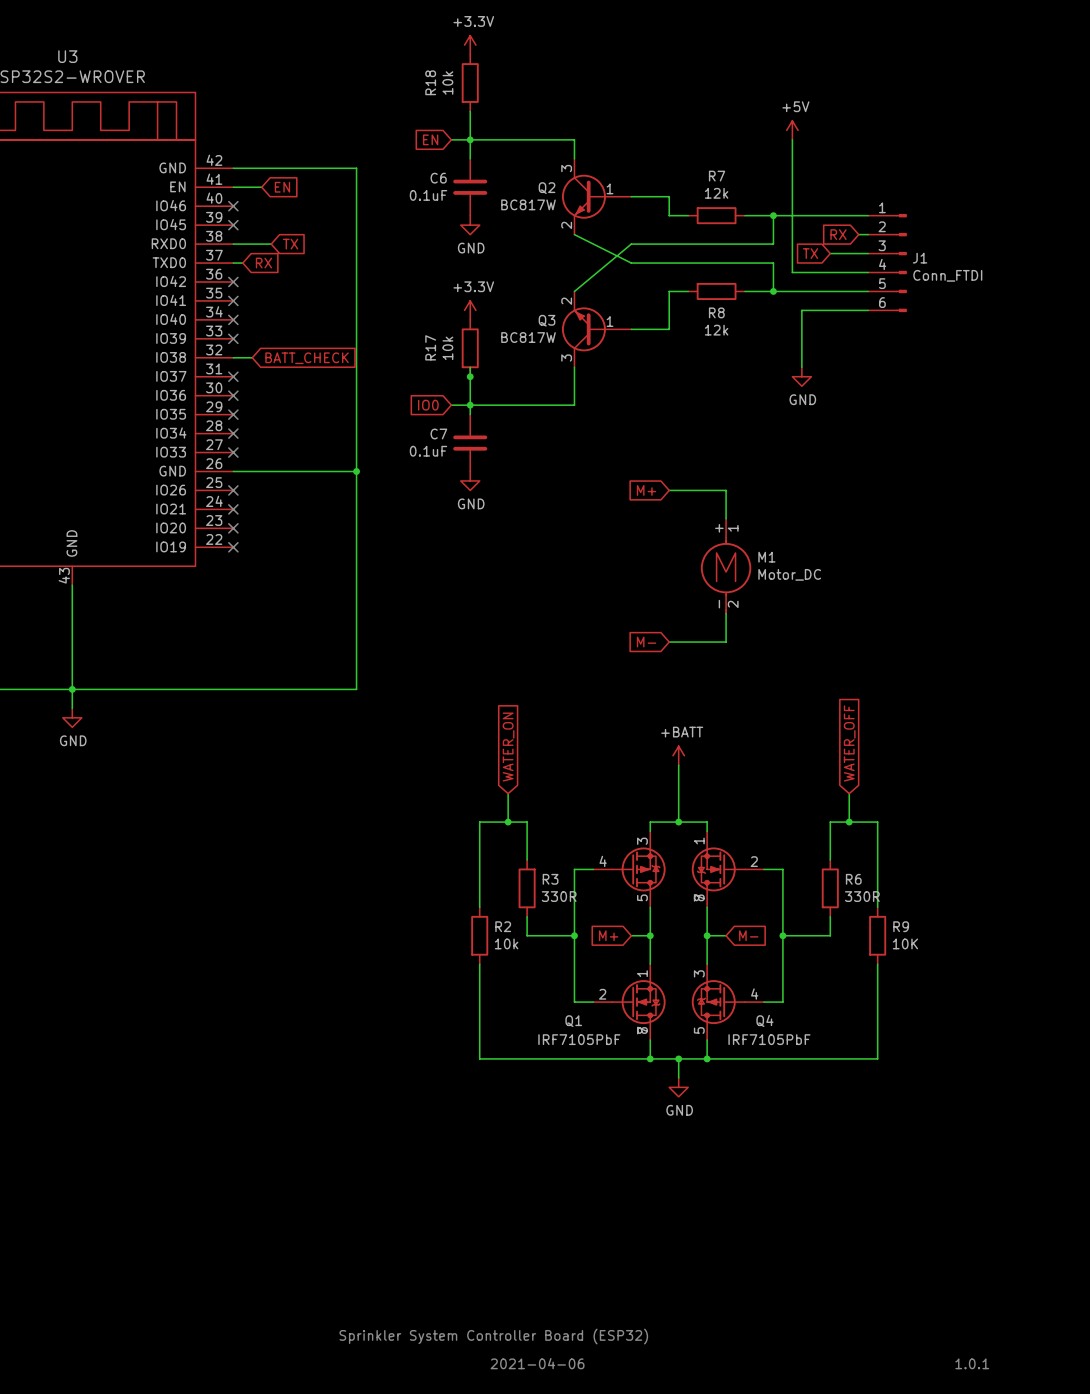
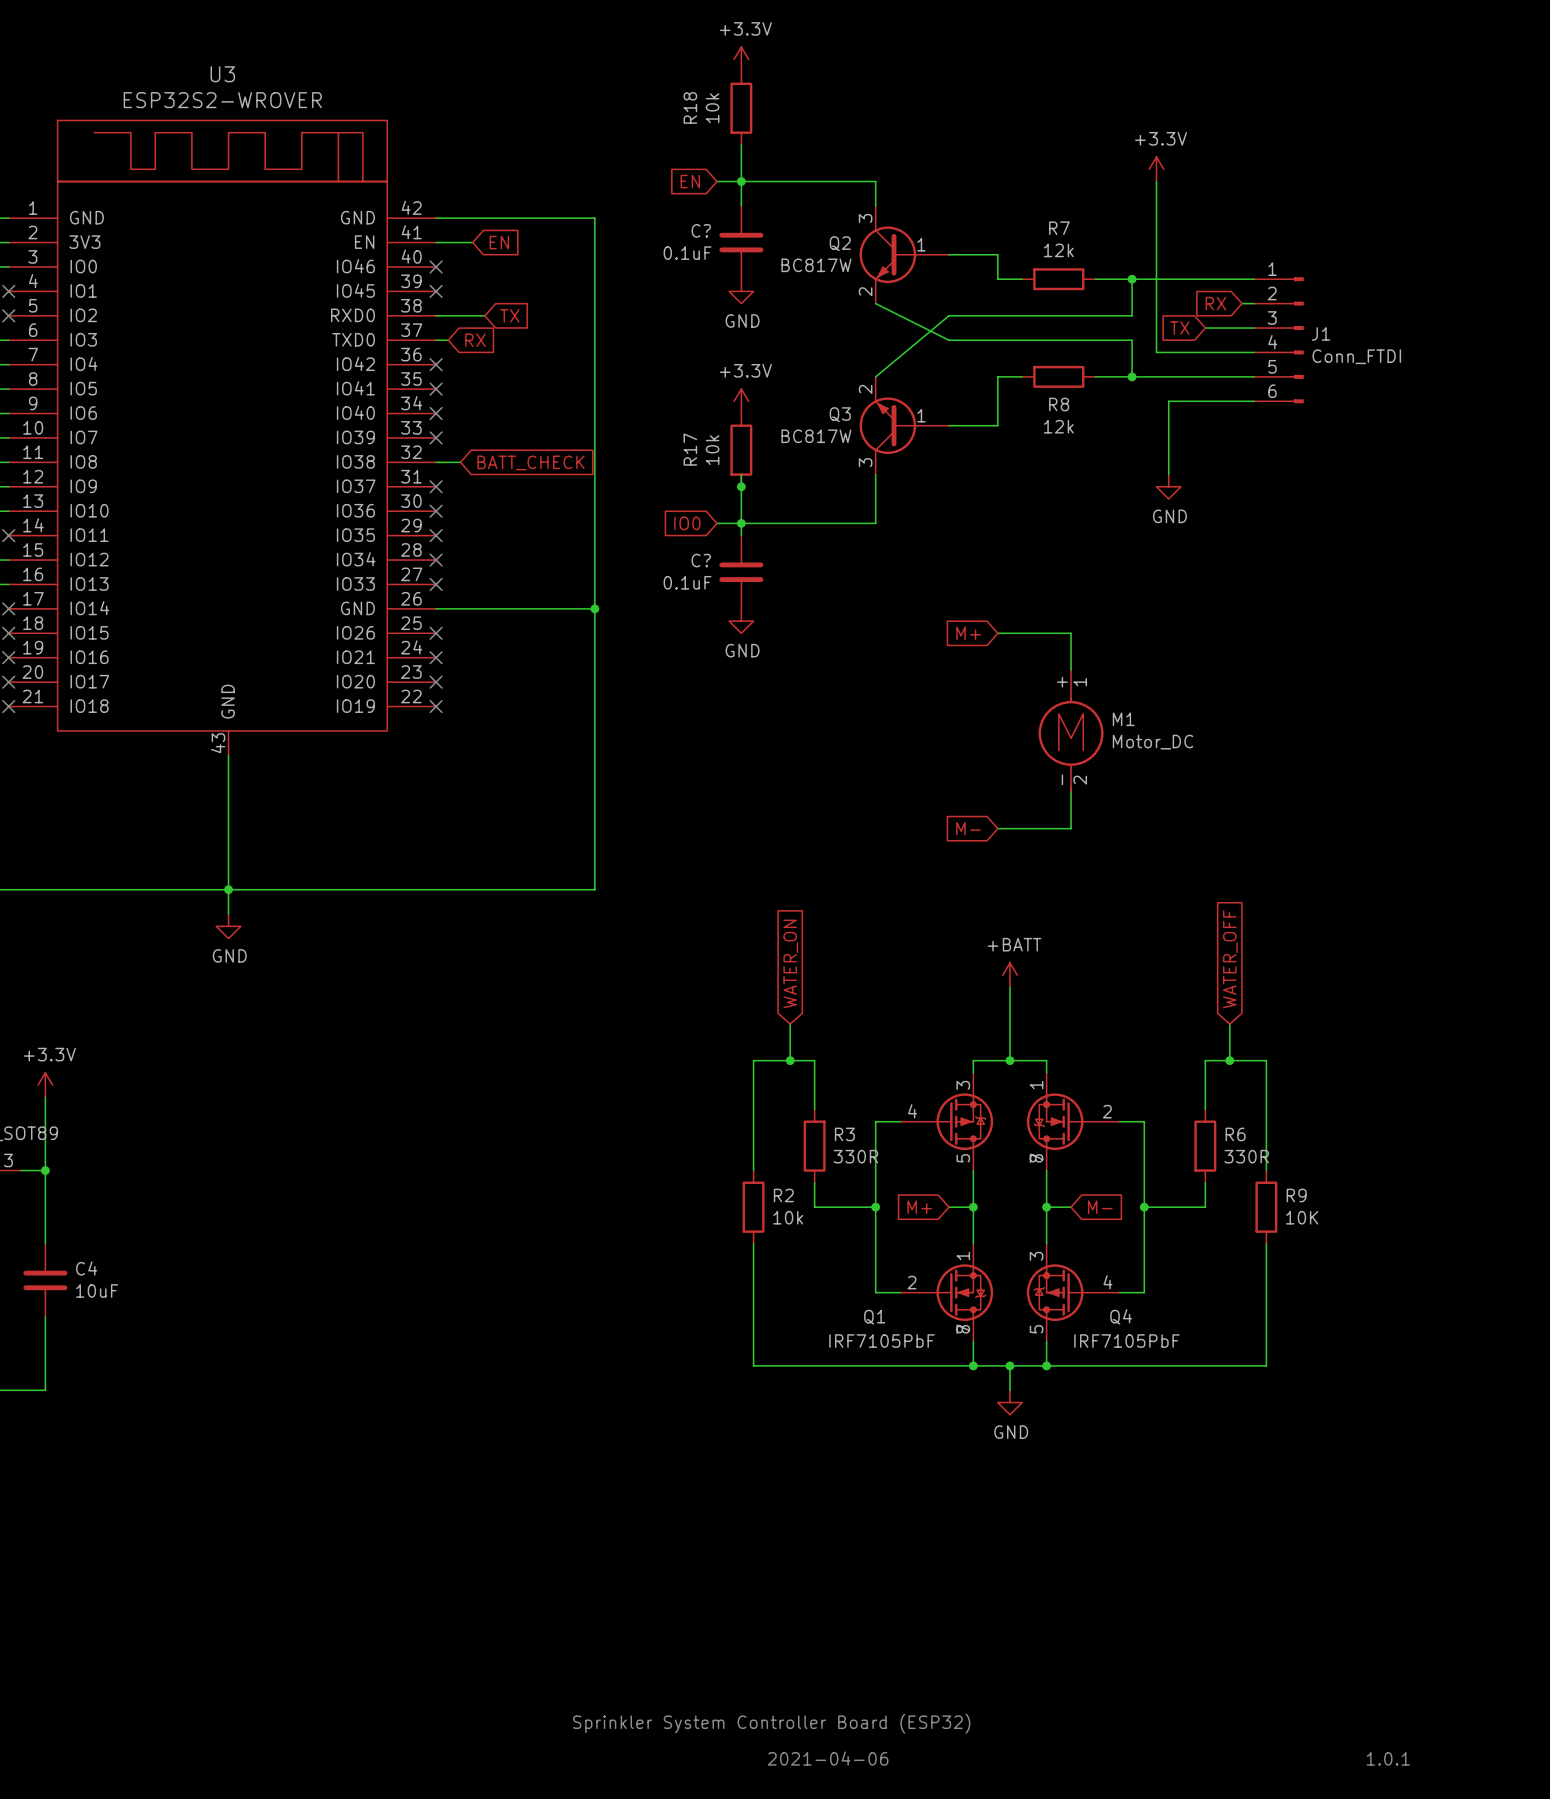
power symbol: +5V (792, 130) -> +3.3V (1156, 169)
C6 name: C6 (438, 178) -> C? (701, 230)
C7 name: C7 (438, 433) -> C? (701, 560)

